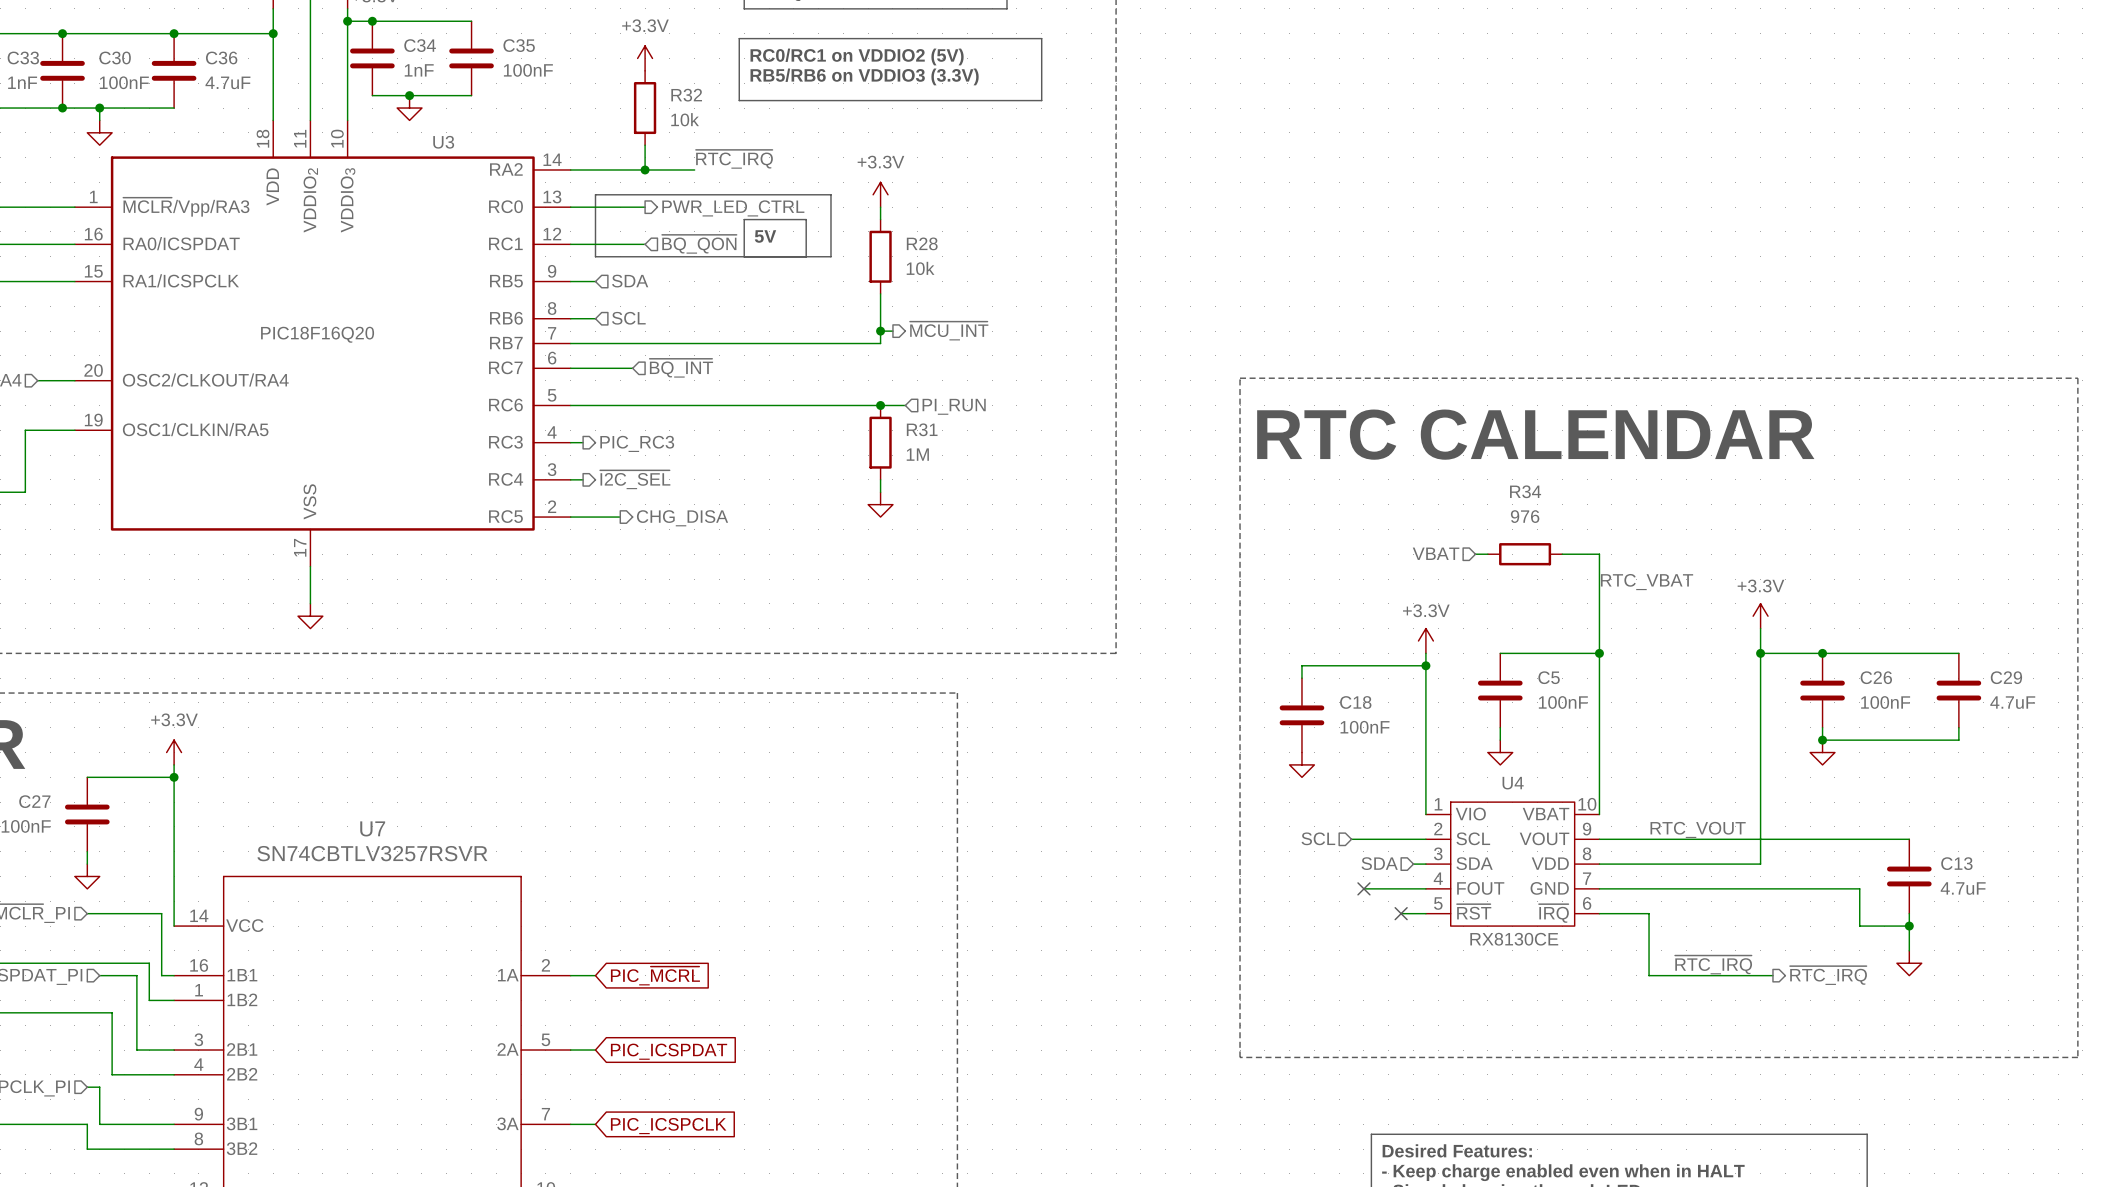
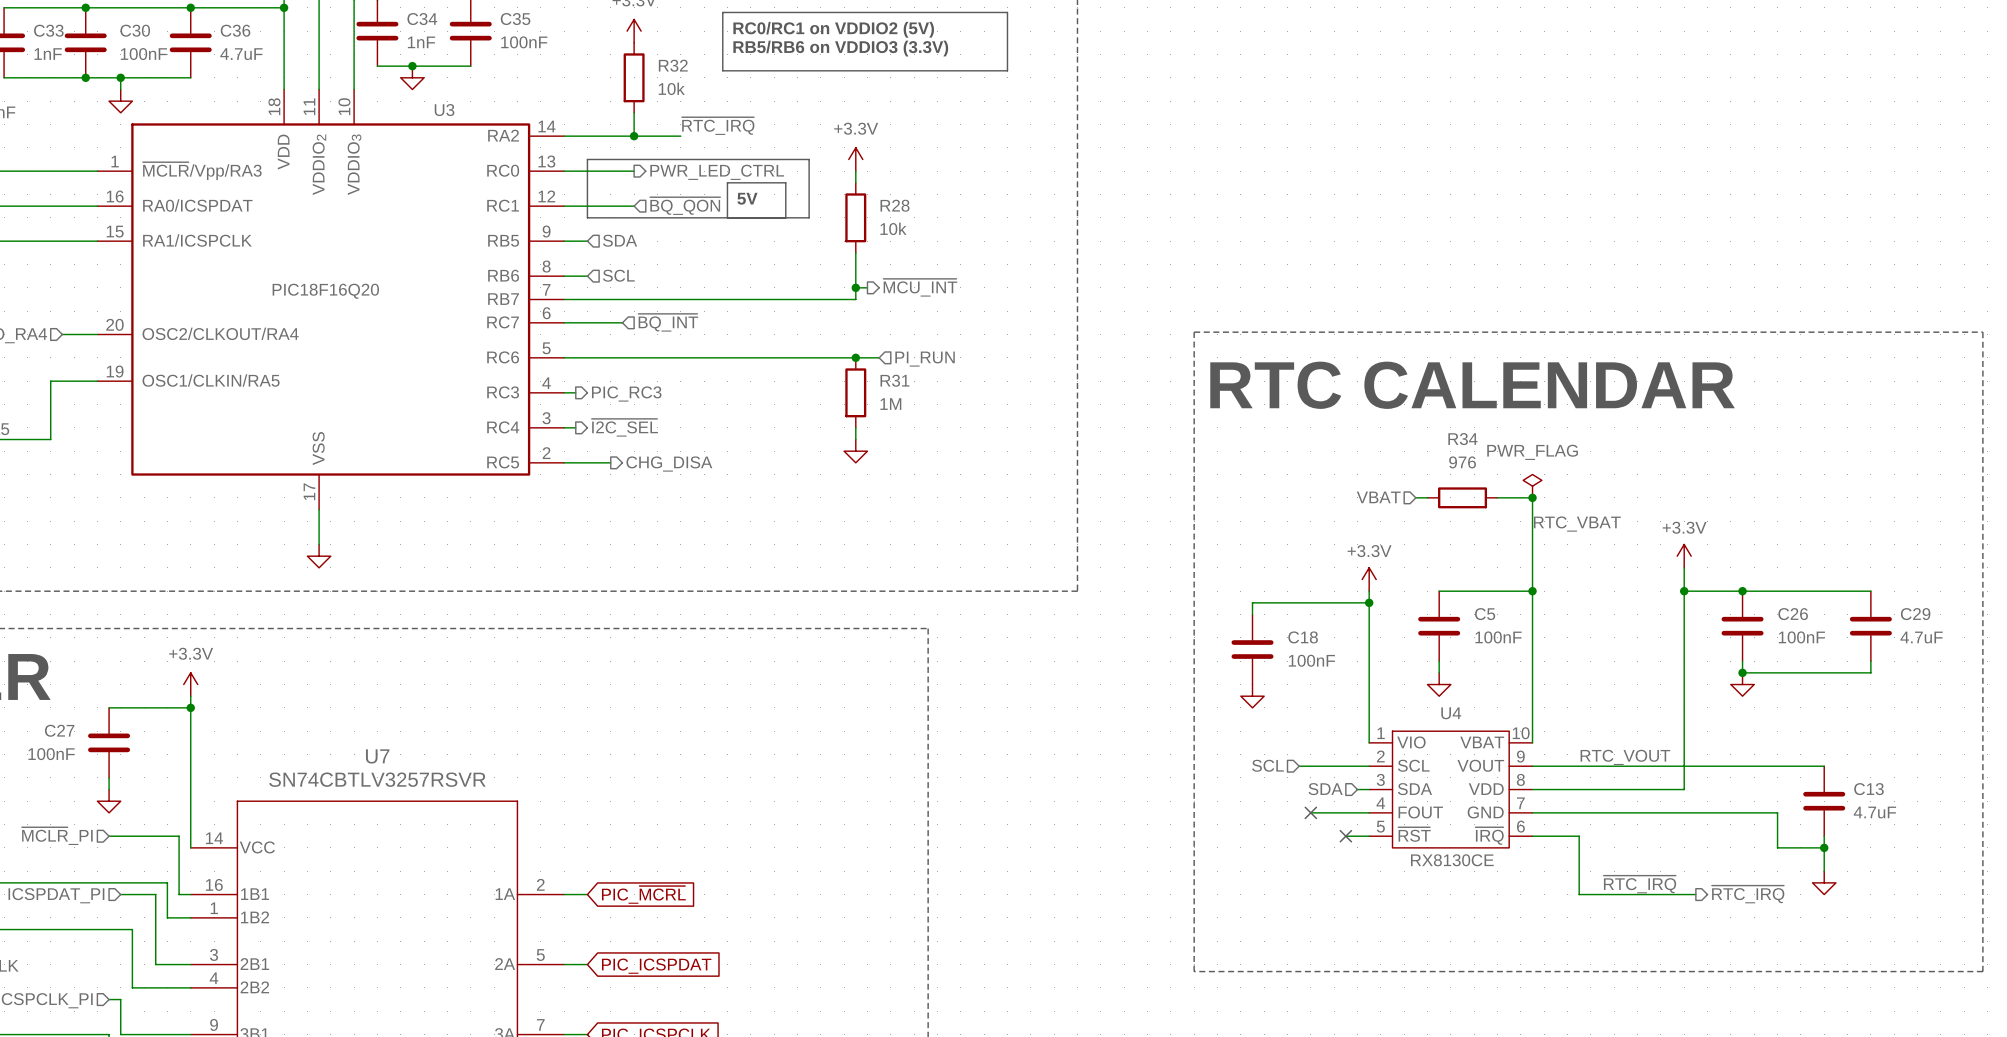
power symbol: none -> PWR_FLAG (1532, 486)
junction: none -> (1532, 497)

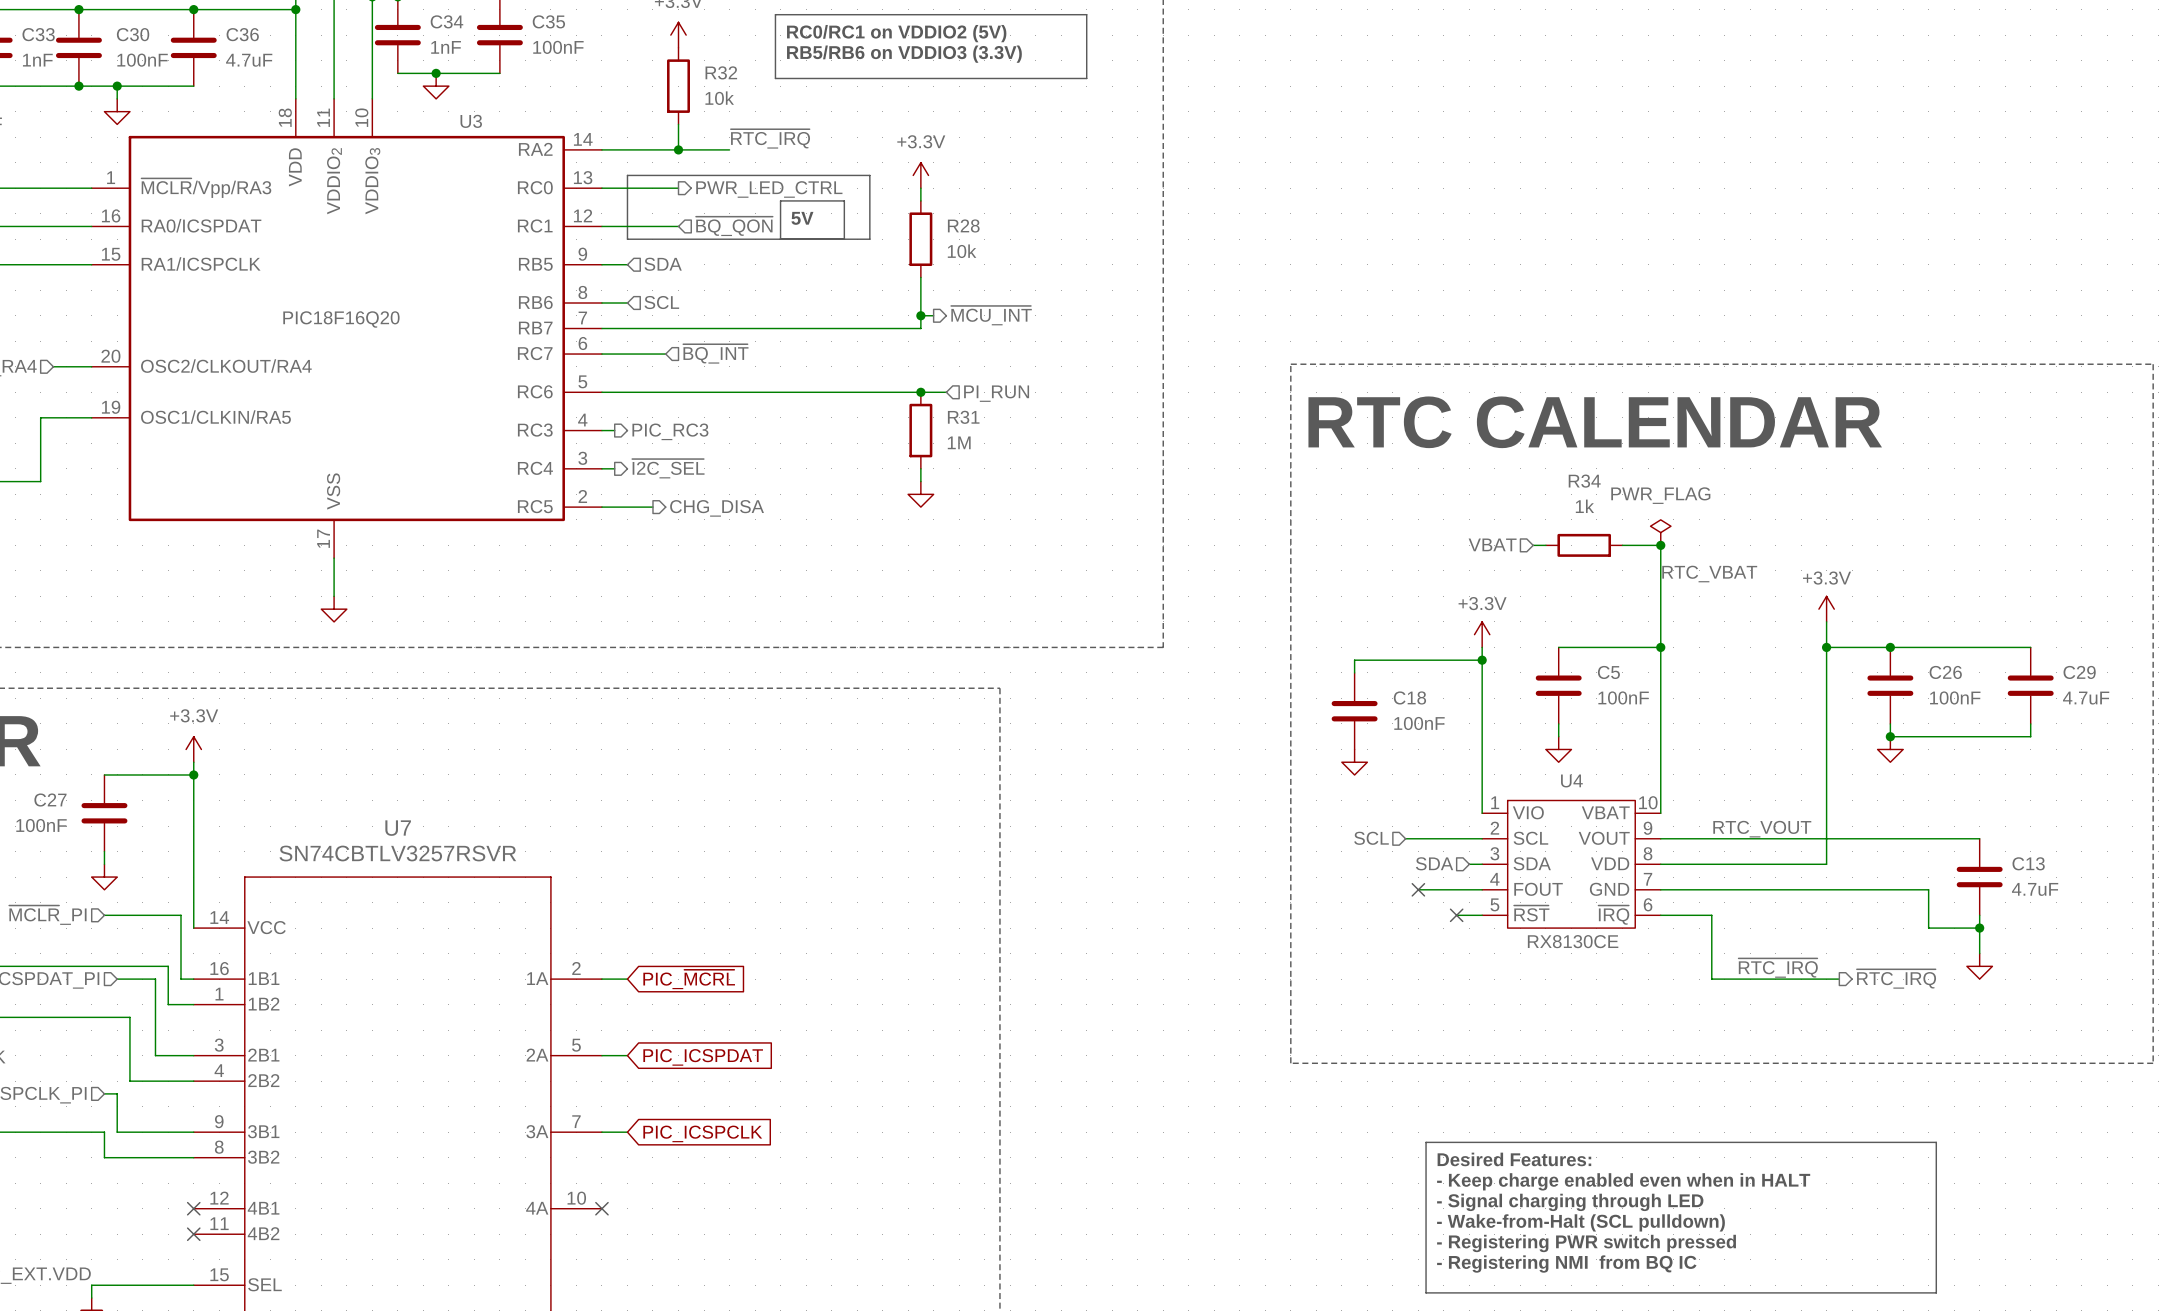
R34 value: 976 (1462, 462) -> 1k (1584, 506)

